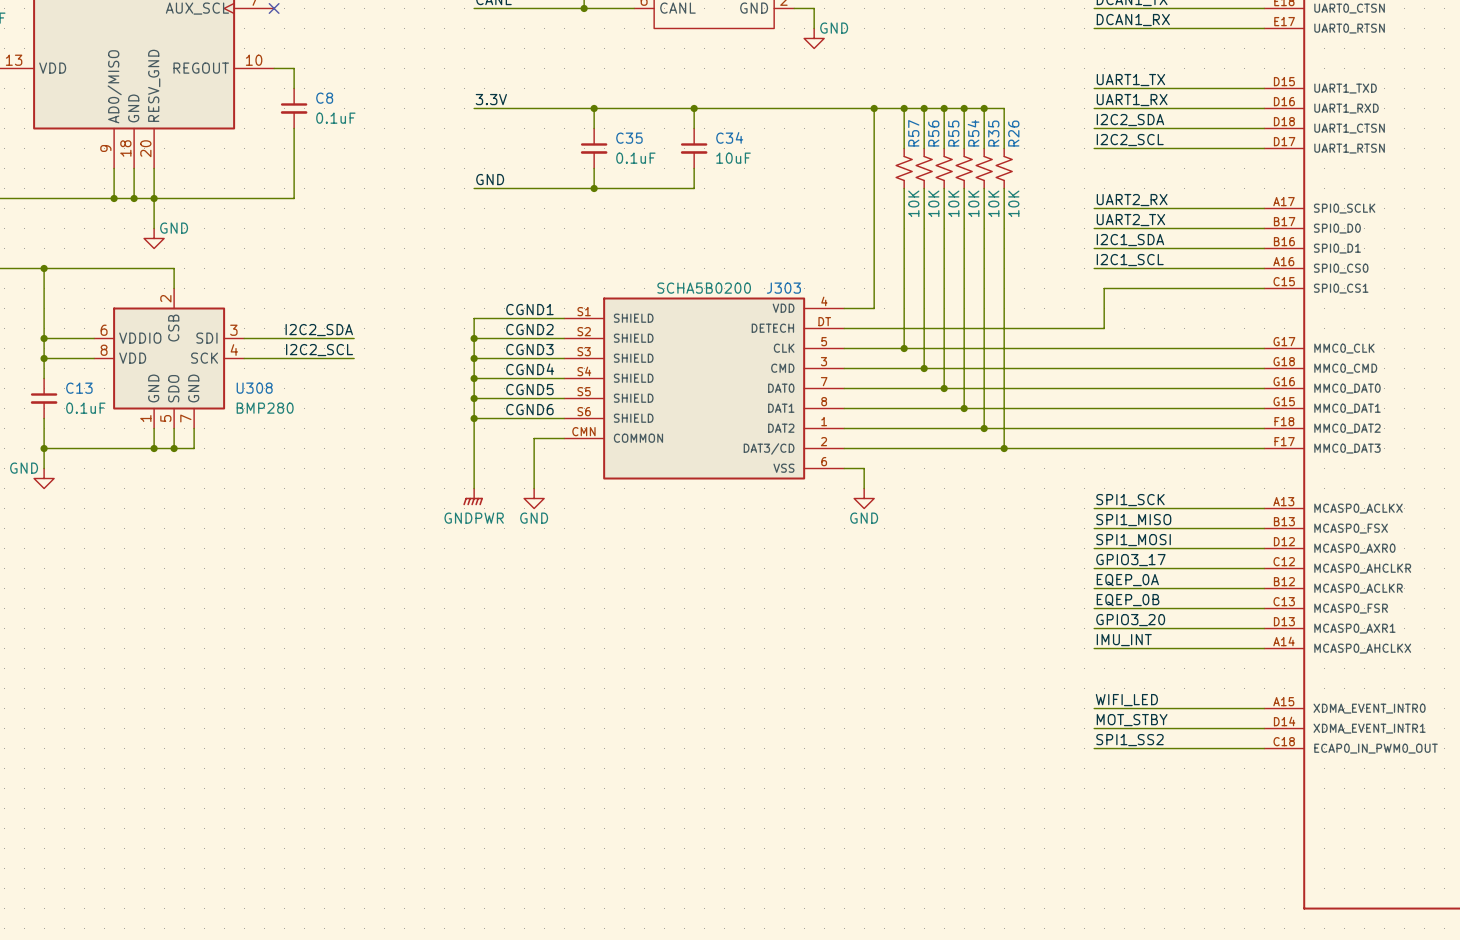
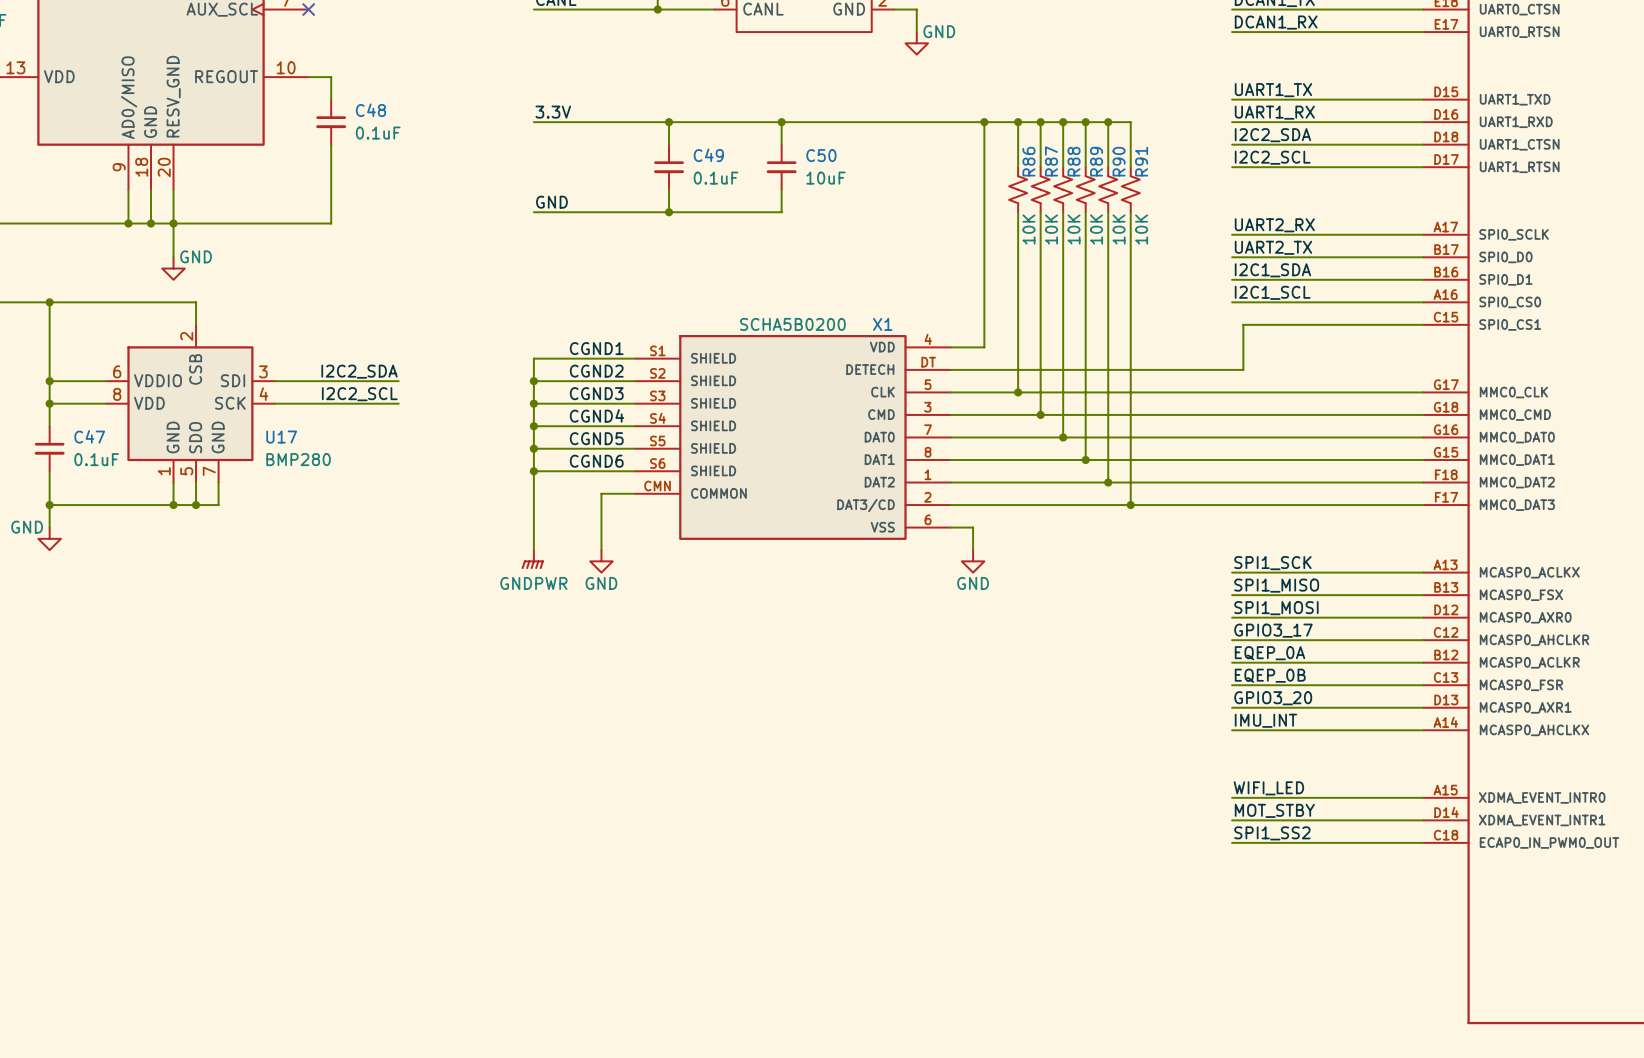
C8 name: C8 (324, 98) -> C48 (370, 110)
R57 name: R57 (913, 133) -> R86 (1028, 161)
R56 name: R56 (933, 133) -> R87 (1051, 161)
R55 name: R55 (953, 133) -> R88 (1074, 161)
R54 name: R54 (973, 133) -> R89 (1096, 161)
R35 name: R35 (993, 133) -> R90 (1119, 161)
R26 name: R26 (1013, 133) -> R91 (1141, 161)
C34 name: C34 (729, 137) -> C50 (821, 155)
C35 name: C35 (629, 138) -> C49 (708, 155)
J303 name: J303 (783, 288) -> X1 (882, 324)
C13 name: C13 (79, 388) -> C47 (89, 436)
U308 name: U308 (254, 388) -> U17 (281, 437)

